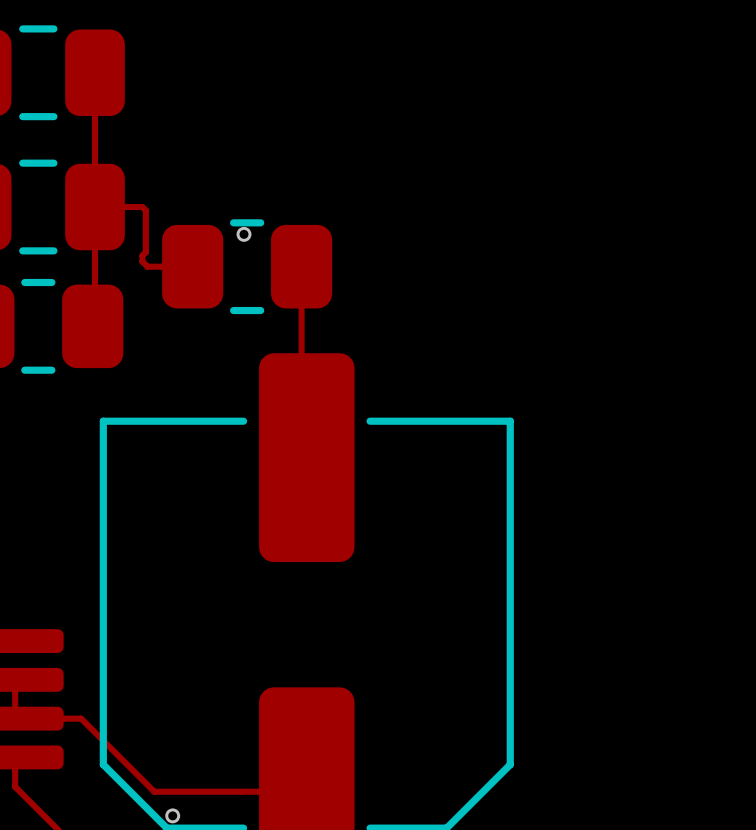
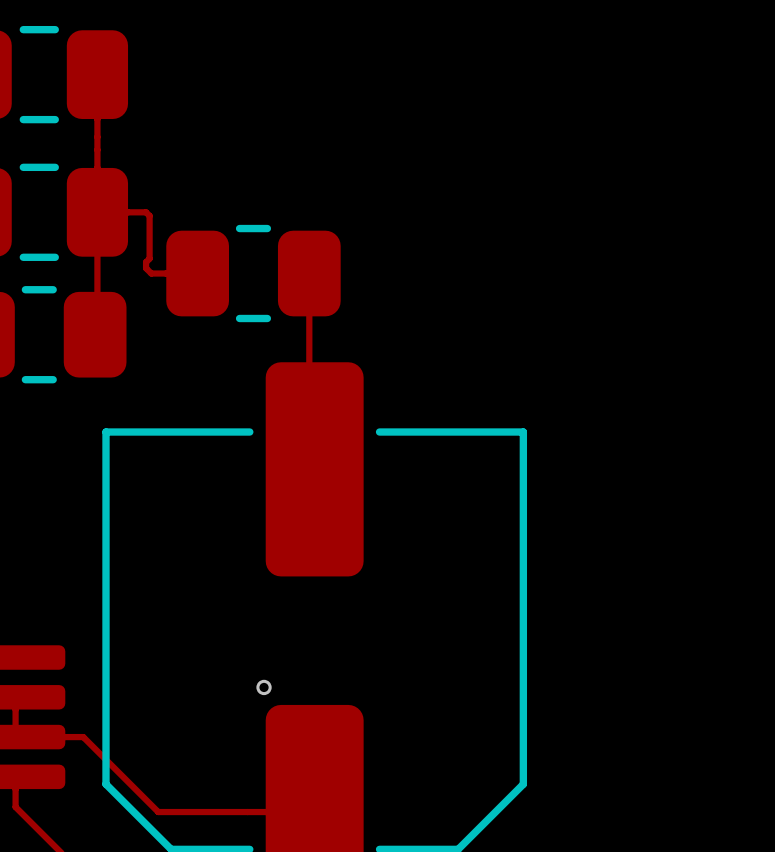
via: (243, 234) -> none
via position: (172, 815) -> (264, 687)

